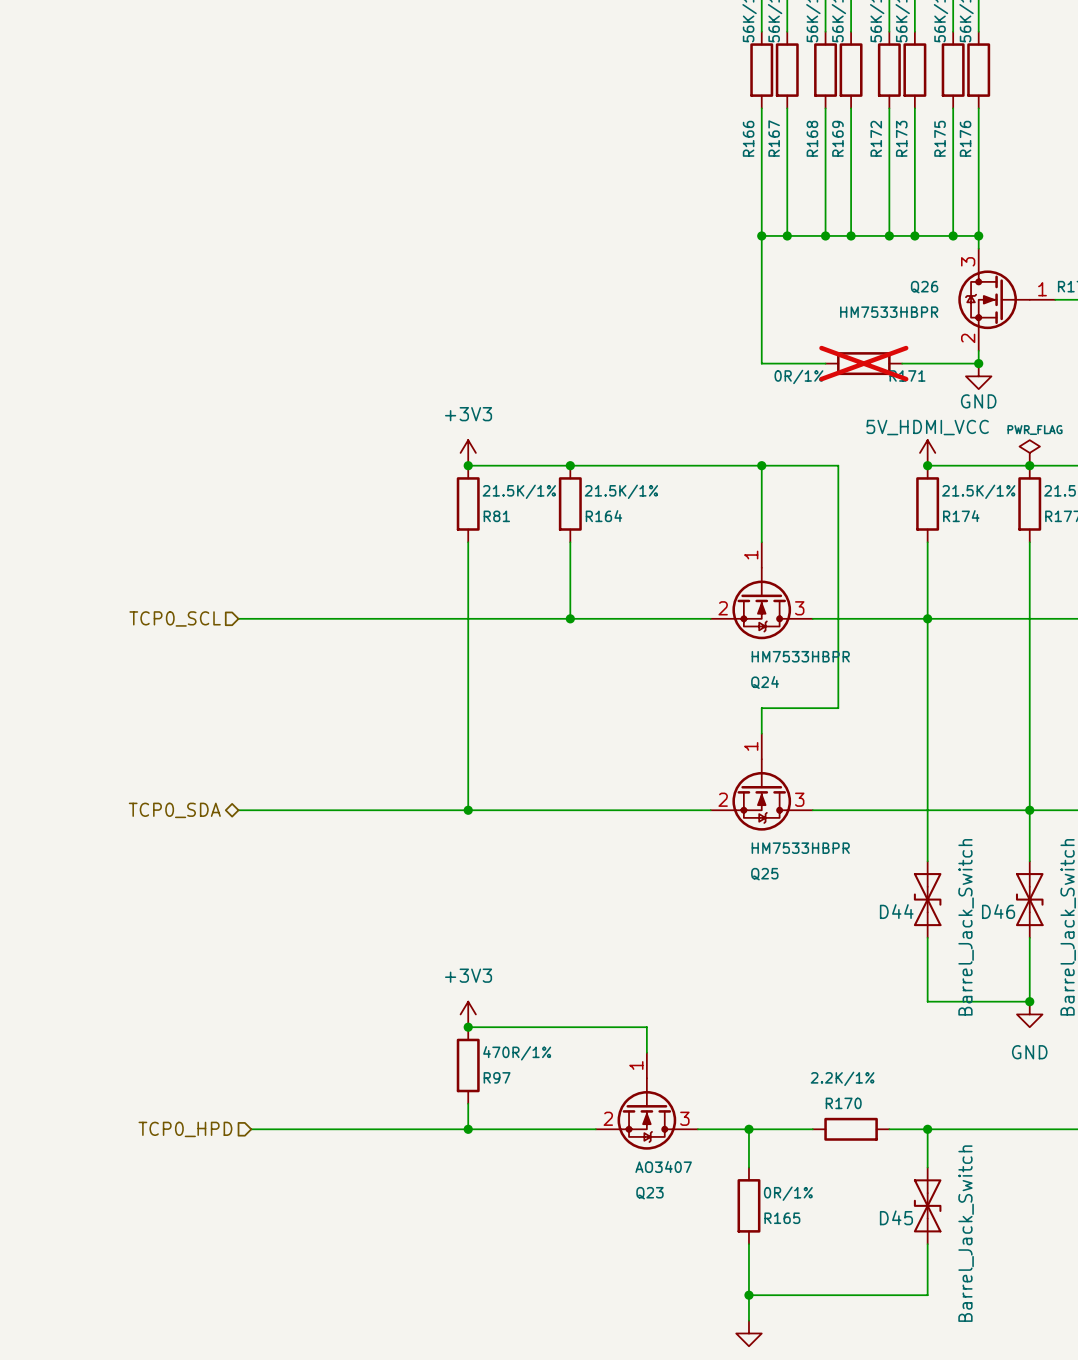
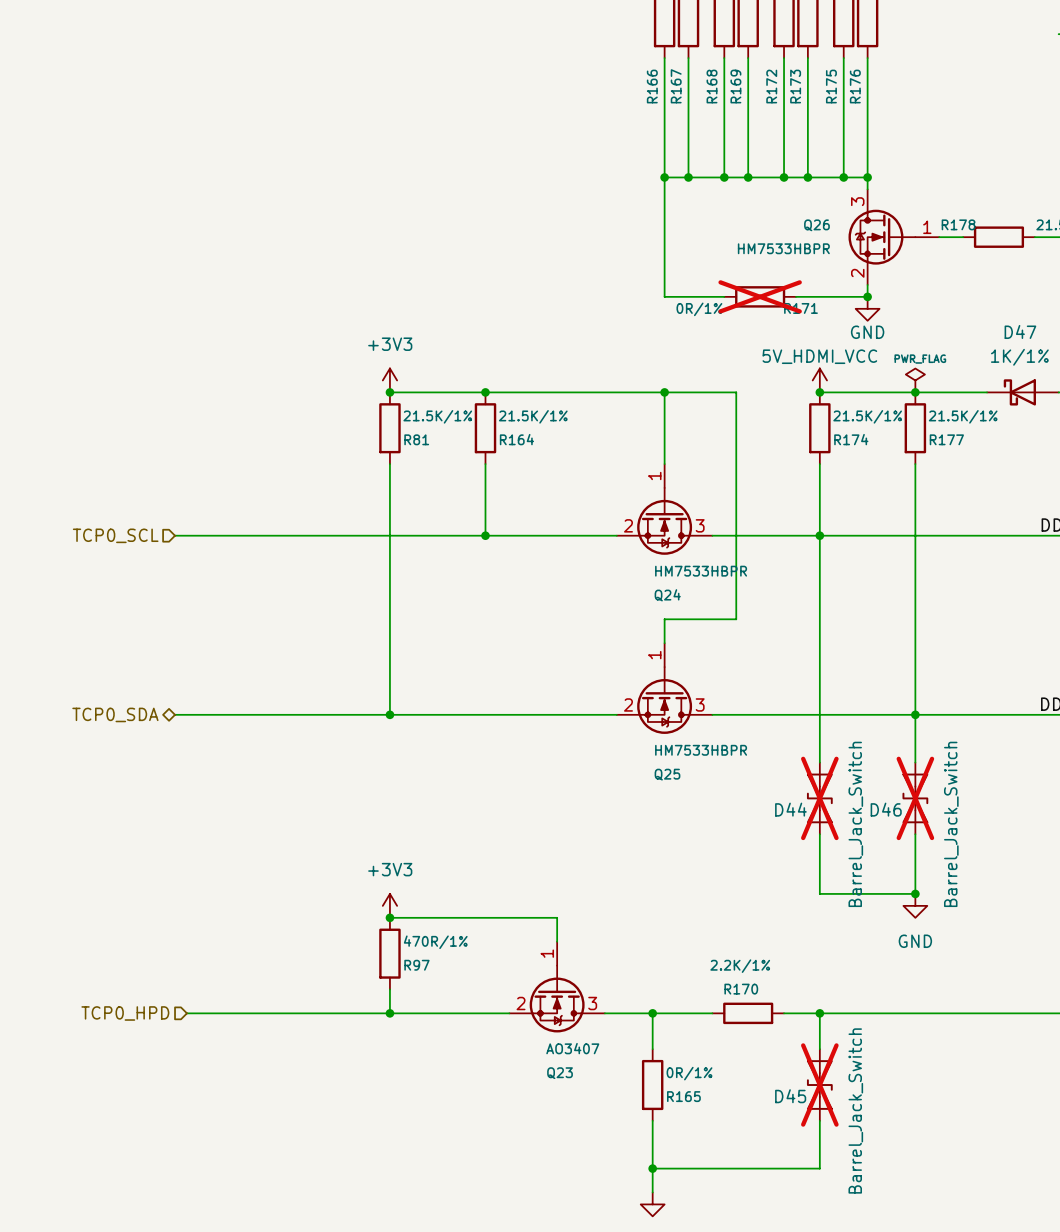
D44 do-not-place cross: none -> (819, 798)
D46 do-not-place cross: none -> (915, 798)
D45 do-not-place cross: none -> (819, 1085)

